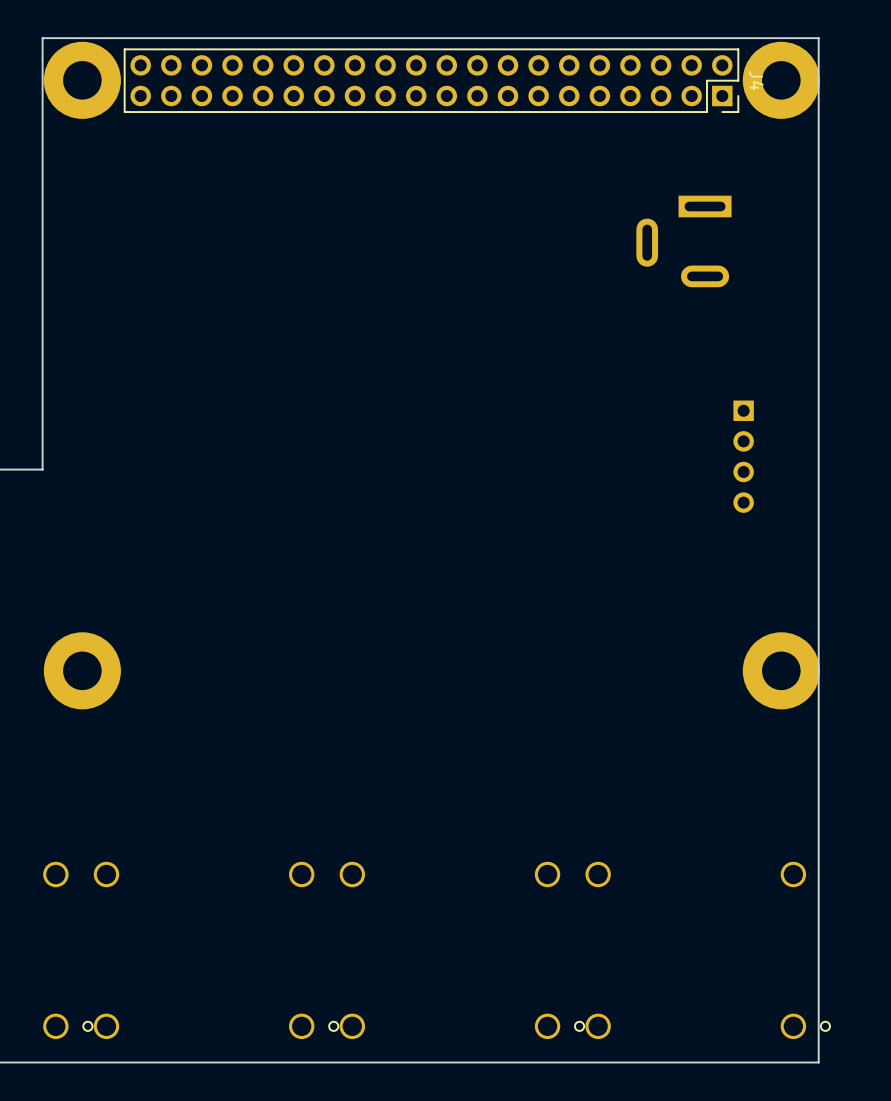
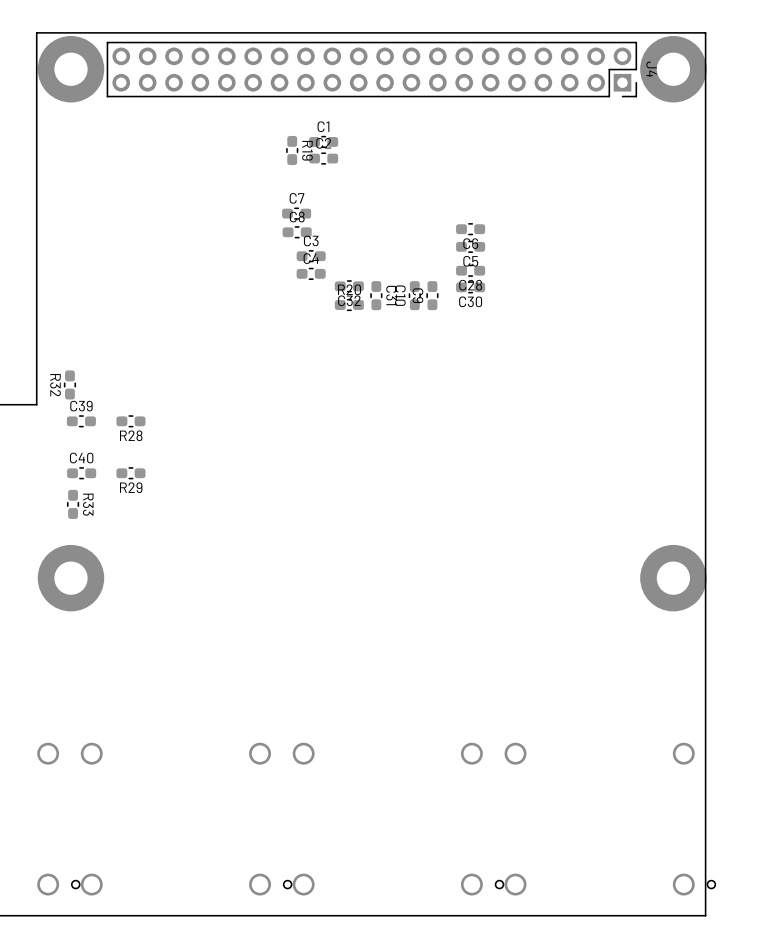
C1: none -> (323, 141)
R19: none -> (292, 150)
C2: none -> (323, 158)
part: (683, 241) -> none
C7: none -> (296, 213)
C6: none -> (470, 229)
C8: none -> (297, 232)
C5: none -> (470, 246)
C3: none -> (311, 256)
C28: none -> (470, 270)
C4: none -> (311, 273)
C32: none -> (349, 286)
C30: none -> (470, 287)
C31: none -> (376, 295)
C10: none -> (414, 295)
C9: none -> (432, 295)
R20: none -> (349, 305)
R32: none -> (69, 384)
part: (743, 456) -> none
C39: none -> (81, 421)
R28: none -> (130, 421)
C40: none -> (81, 473)
R29: none -> (130, 473)
R33: none -> (73, 504)

